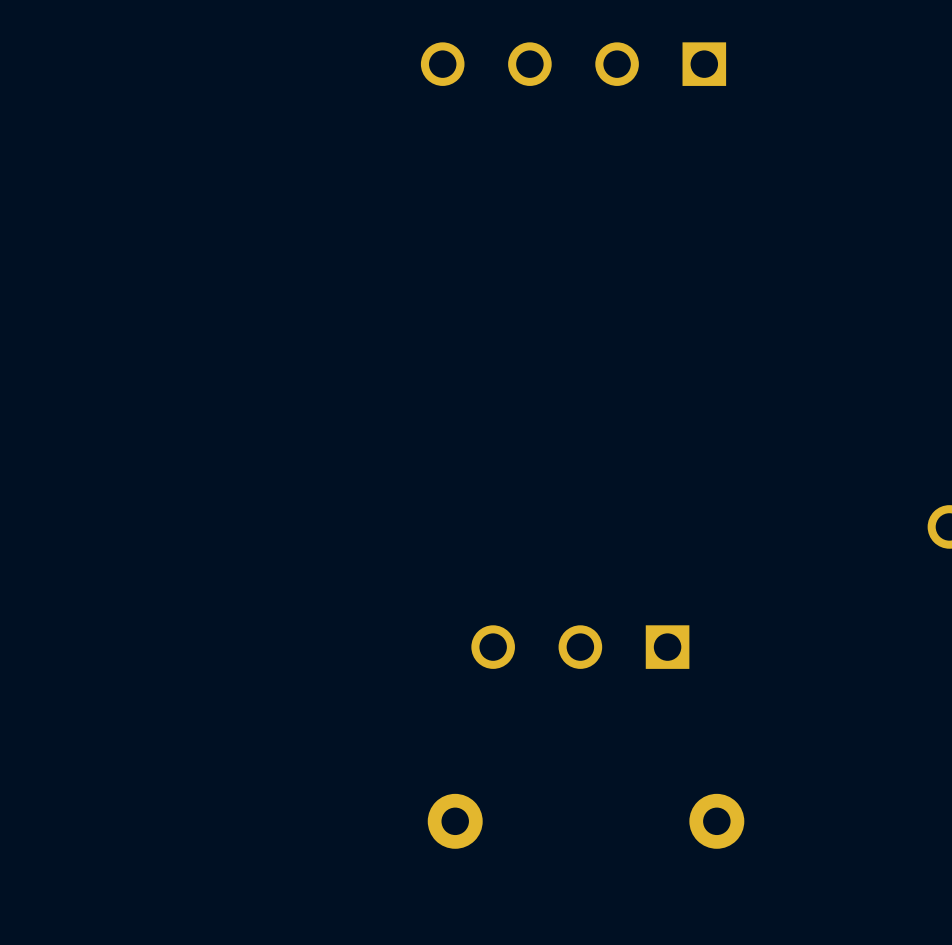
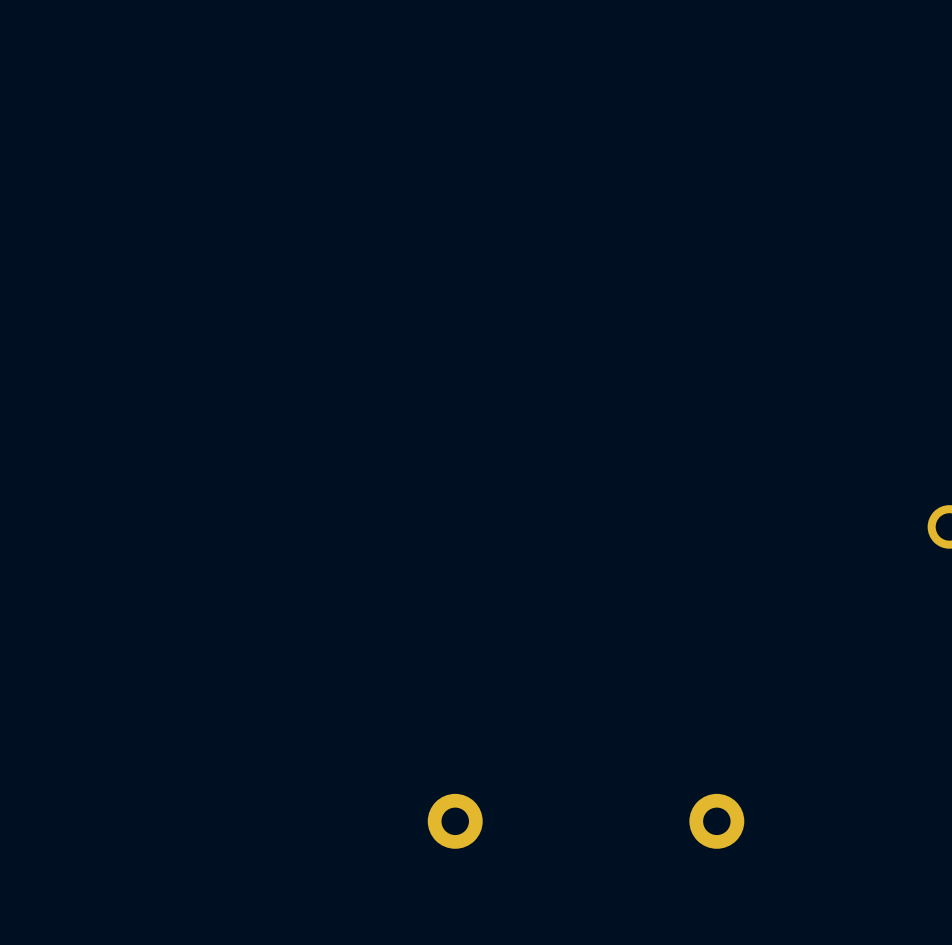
part: (573, 64) -> none
part: (580, 647) -> none

